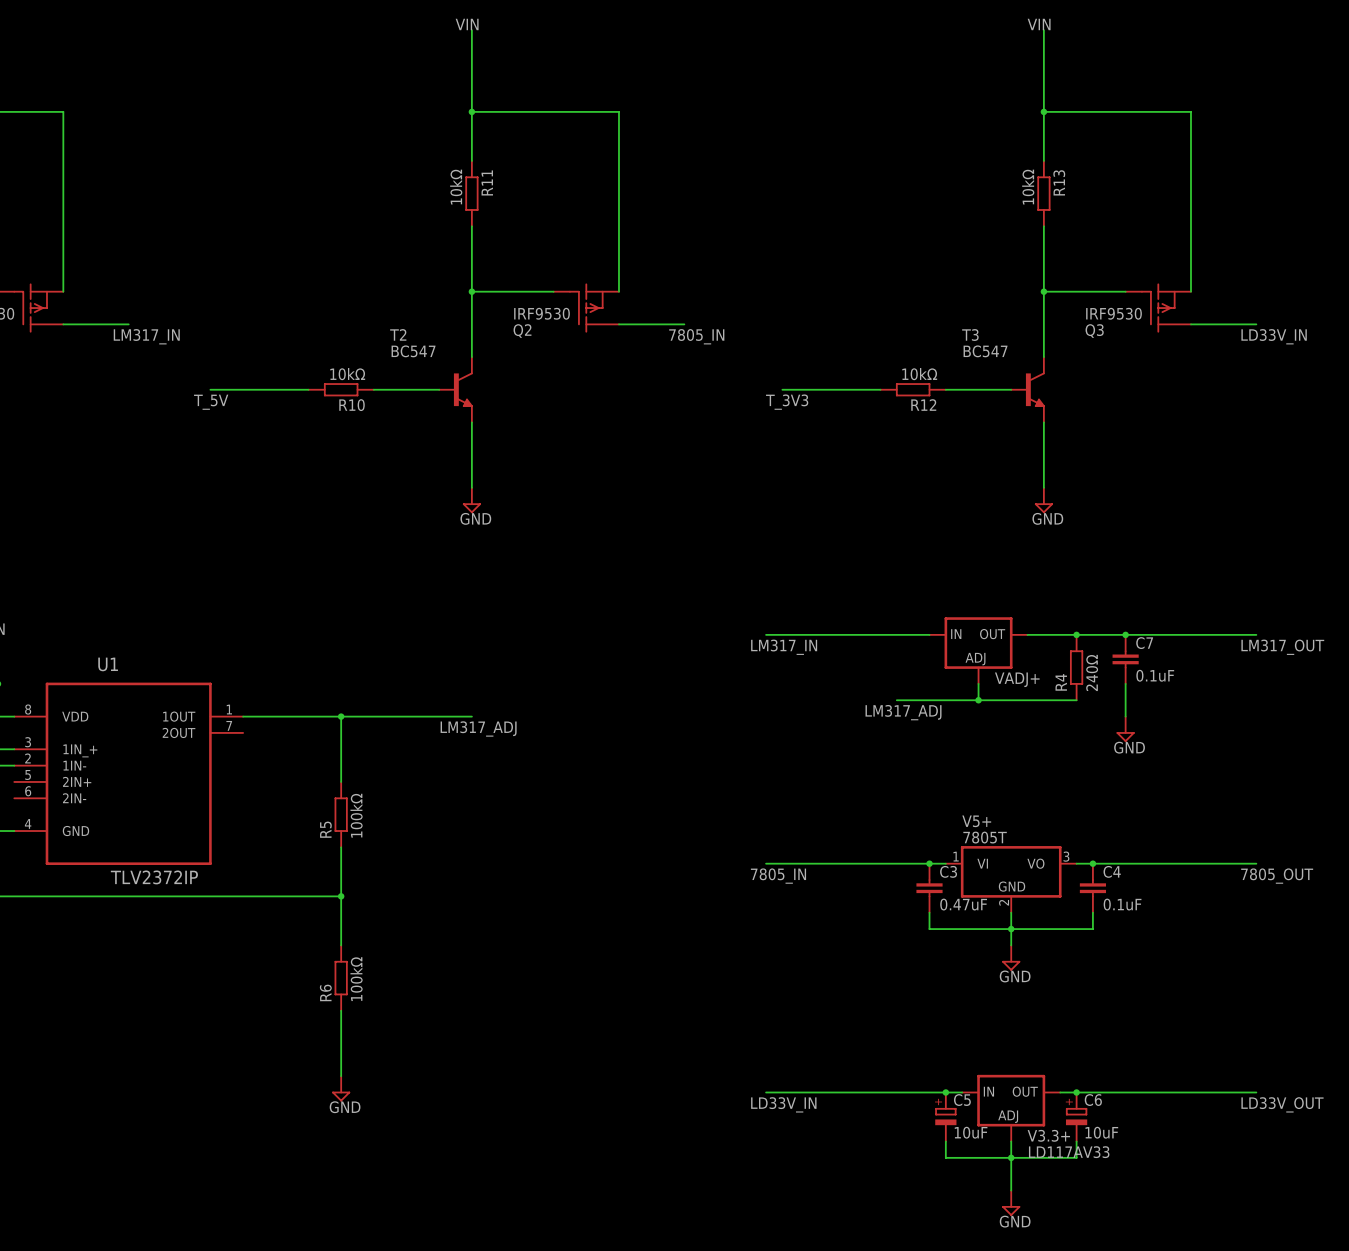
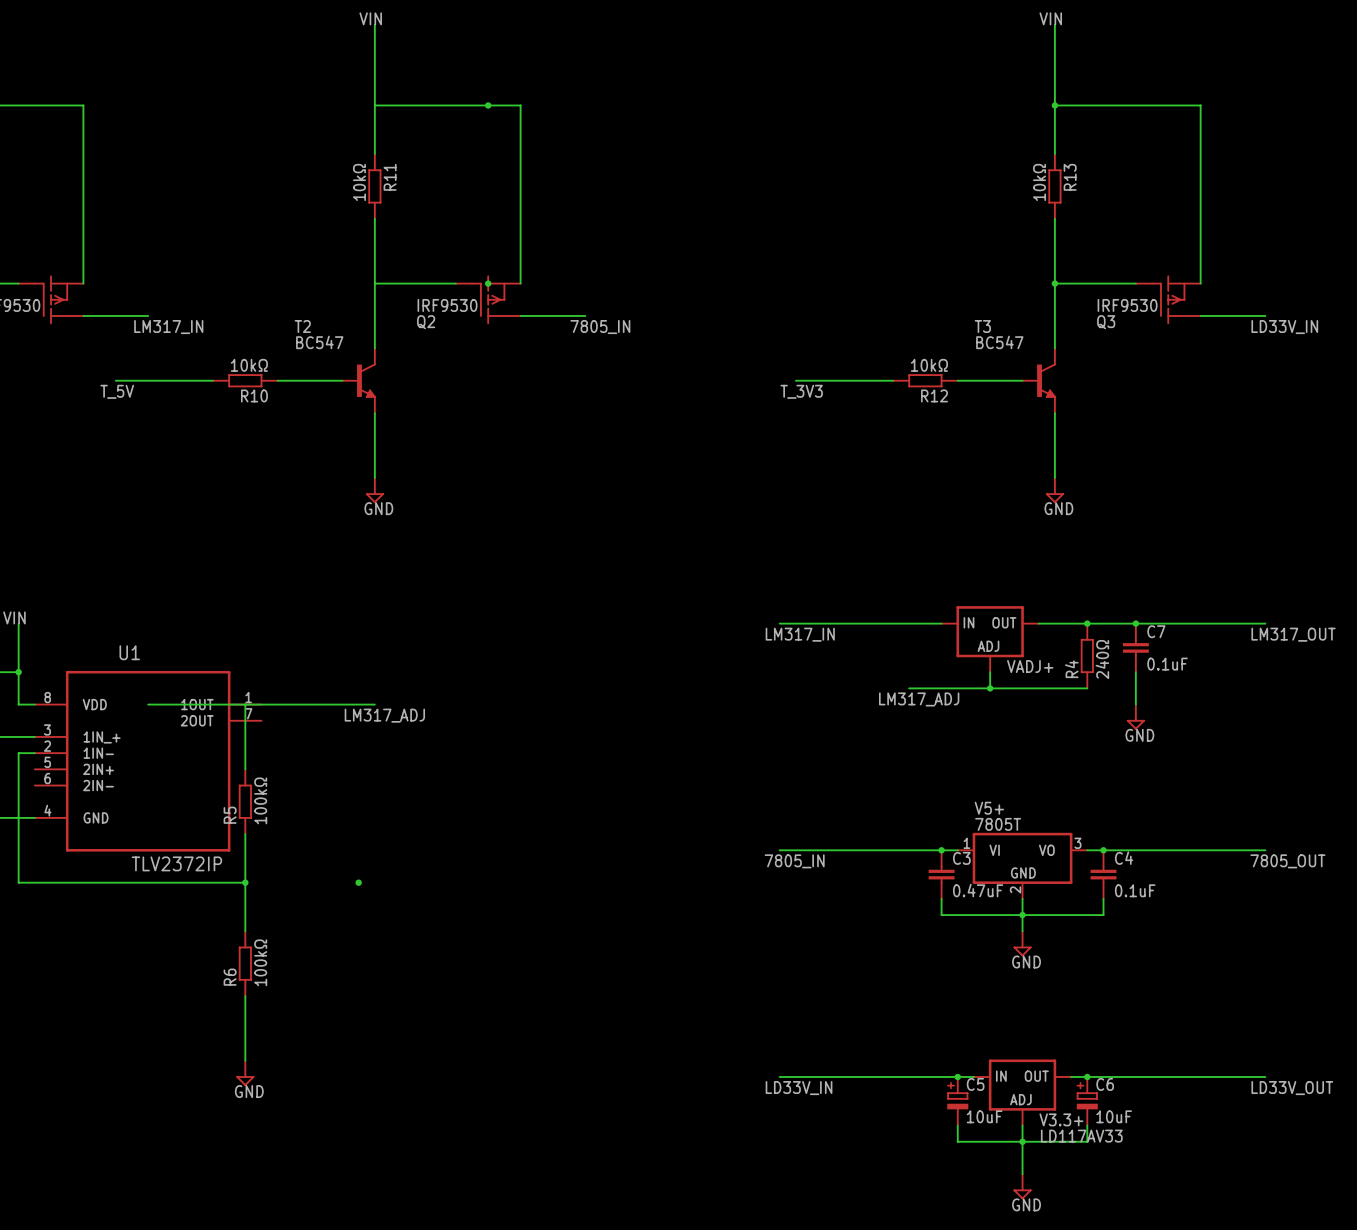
label position: VIN (467, 24) -> VIN (370, 18)
wire: (471, 30) (471, 160) -> (374, 24) (374, 154)
wire: none -> (374, 105) (488, 105)
wire: (504, 111) (618, 111) (618, 291) -> (520, 105) (520, 283)
R11 position: (471, 193) -> (374, 186)
wire: (471, 226) (471, 357) -> (374, 218) (374, 348)
wire: (471, 291) (553, 291) -> (374, 283) (455, 283)
Q2 position: (586, 308) -> (488, 299)
wire: (618, 324) (684, 324) -> (520, 315) (585, 315)
label position: 7805_IN (696, 336) -> 7805_IN (600, 327)
wire: none -> (115, 380) (212, 380)
wire: (210, 389) (259, 389) -> none
R10 position: (341, 389) -> (245, 380)
wire: (373, 389) (439, 389) -> none
T2 position: (455, 389) -> (358, 380)
label position: T_5V (211, 402) -> T_5V (117, 391)
wire: (471, 422) (471, 487) -> (374, 413) (374, 477)
power symbol position: GND (471, 500) -> GND (374, 490)
wire: none -> (148, 704) (261, 704)
wire: (341, 716) (341, 781) -> (245, 704) (245, 769)
junction: (341, 716) -> none
wire: (357, 716) (471, 716) -> none
label position: LM317_ADJ (478, 728) -> LM317_ADJ (384, 715)
R5 position: (341, 814) -> (245, 801)
wire: (341, 847) (341, 945) -> (245, 834) (245, 931)
wire: (226, 896) (341, 896) -> none
junction: none -> (245, 882)
R6 position: (341, 978) -> (245, 963)
wire: (341, 1010) (341, 1076) -> (245, 996) (245, 1060)
power symbol position: GND (341, 1088) -> GND (245, 1073)

